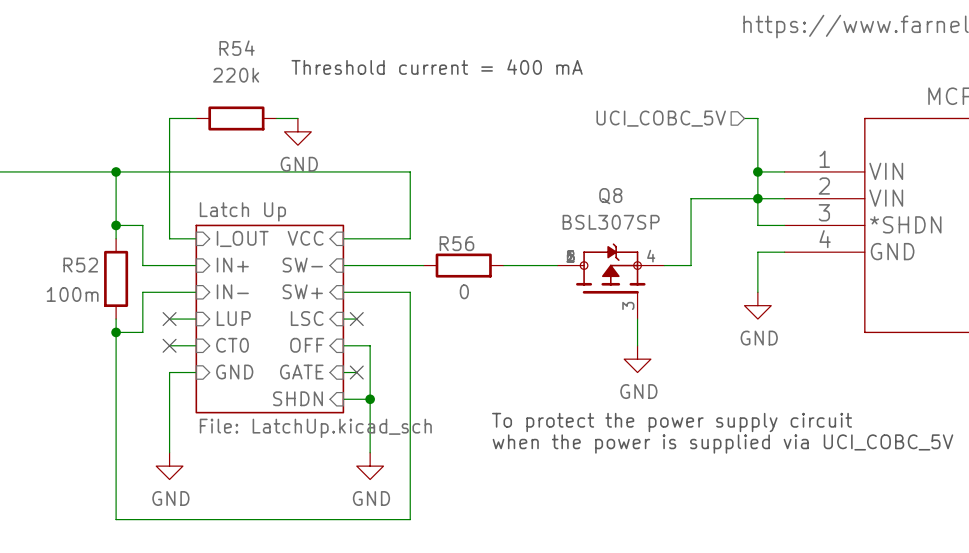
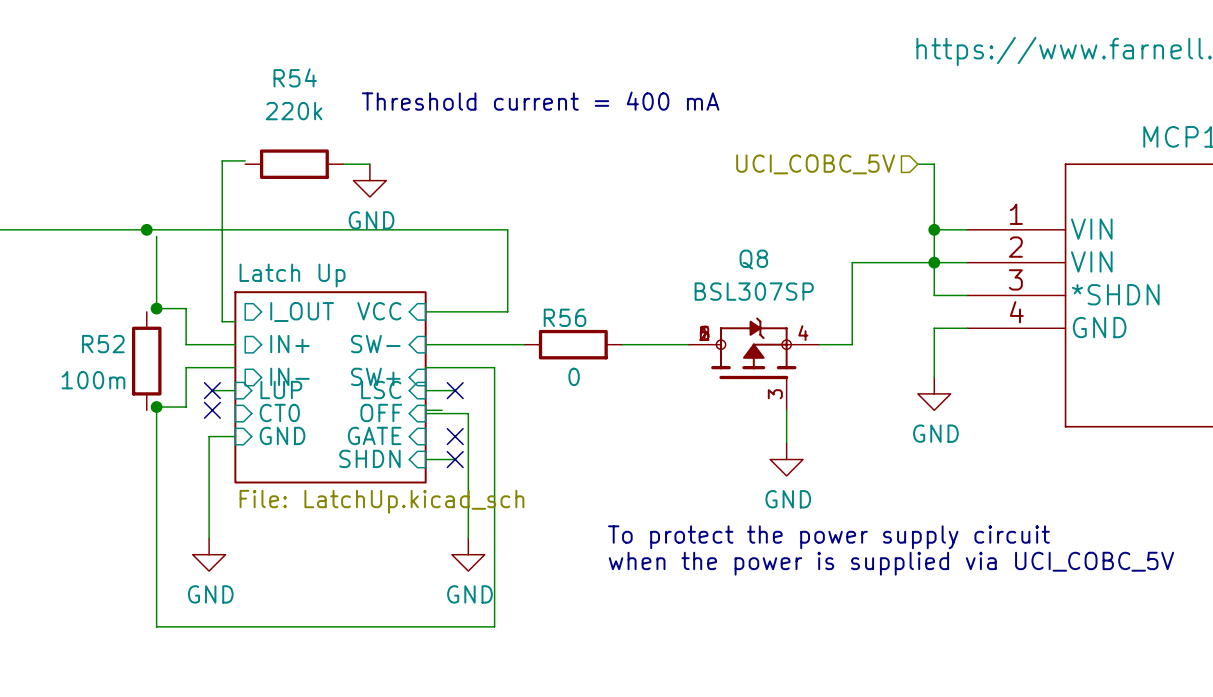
wire: none -> (245, 160) (222, 160) (222, 321) (235, 321)
wire: (196, 118) (169, 118) (169, 238) (196, 238) -> none
wire: (116, 171) (116, 238) -> none
wire: (116, 225) (142, 225) (142, 265) (148, 265) -> (156, 236) (156, 308) (186, 308) (186, 344)
junction position: (116, 225) -> (156, 308)
wire: (188, 265) (196, 265) -> none
wire: none -> (235, 367) (186, 367) (186, 407) (156, 407) (156, 626) (494, 626) (494, 367) (425, 367)
wire: (196, 292) (142, 292) (142, 332) (116, 332) -> none
wire: (343, 292) (410, 292) (410, 519) (116, 519) (116, 319) -> none
sheet Latch Up: none -> File: LatchUp.kicad_sch (330, 387)
wire: none -> (212, 390) (235, 390)
wire: none -> (425, 390) (455, 390)
no-connect mark: none -> (455, 390)
sheet pin position: LUP (233, 318) -> LUP (281, 390)
sheet pin position: LSC (307, 318) -> LSC (381, 390)
wire: (169, 319) (196, 319) -> none
sheet Latch Up: File: LatchUp.kicad_sch (269, 319) -> none
no-connect mark: (356, 319) -> none
wire: none -> (425, 413) (468, 413) (468, 538)
junction position: (116, 332) -> (156, 407)
wire: none -> (235, 436) (209, 436) (209, 538)
no-connect mark: none -> (455, 436)
wire: (169, 345) (196, 345) -> none
no-connect mark position: (169, 345) -> (212, 390)
sheet pin position: CT0 (232, 345) -> CT0 (279, 412)
sheet pin position: OFF (307, 345) -> OFF (381, 412)
wire: (343, 345) (370, 345) (370, 452) -> none
wire: none -> (425, 459) (455, 459)
no-connect mark: none -> (455, 459)
wire: (196, 372) (169, 372) (169, 452) -> none
sheet pin position: GND (234, 372) -> GND (282, 435)
sheet pin position: GATE (301, 372) -> GATE (374, 435)
wire: (343, 372) (356, 372) -> none
no-connect mark: (356, 372) -> none
sheet pin position: SHDN (297, 398) -> SHDN (369, 458)
wire: (343, 399) (370, 399) -> none
junction: (370, 399) -> none
power symbol position: GND (169, 466) -> GND (209, 554)
power symbol position: GND (370, 466) -> GND (468, 554)

